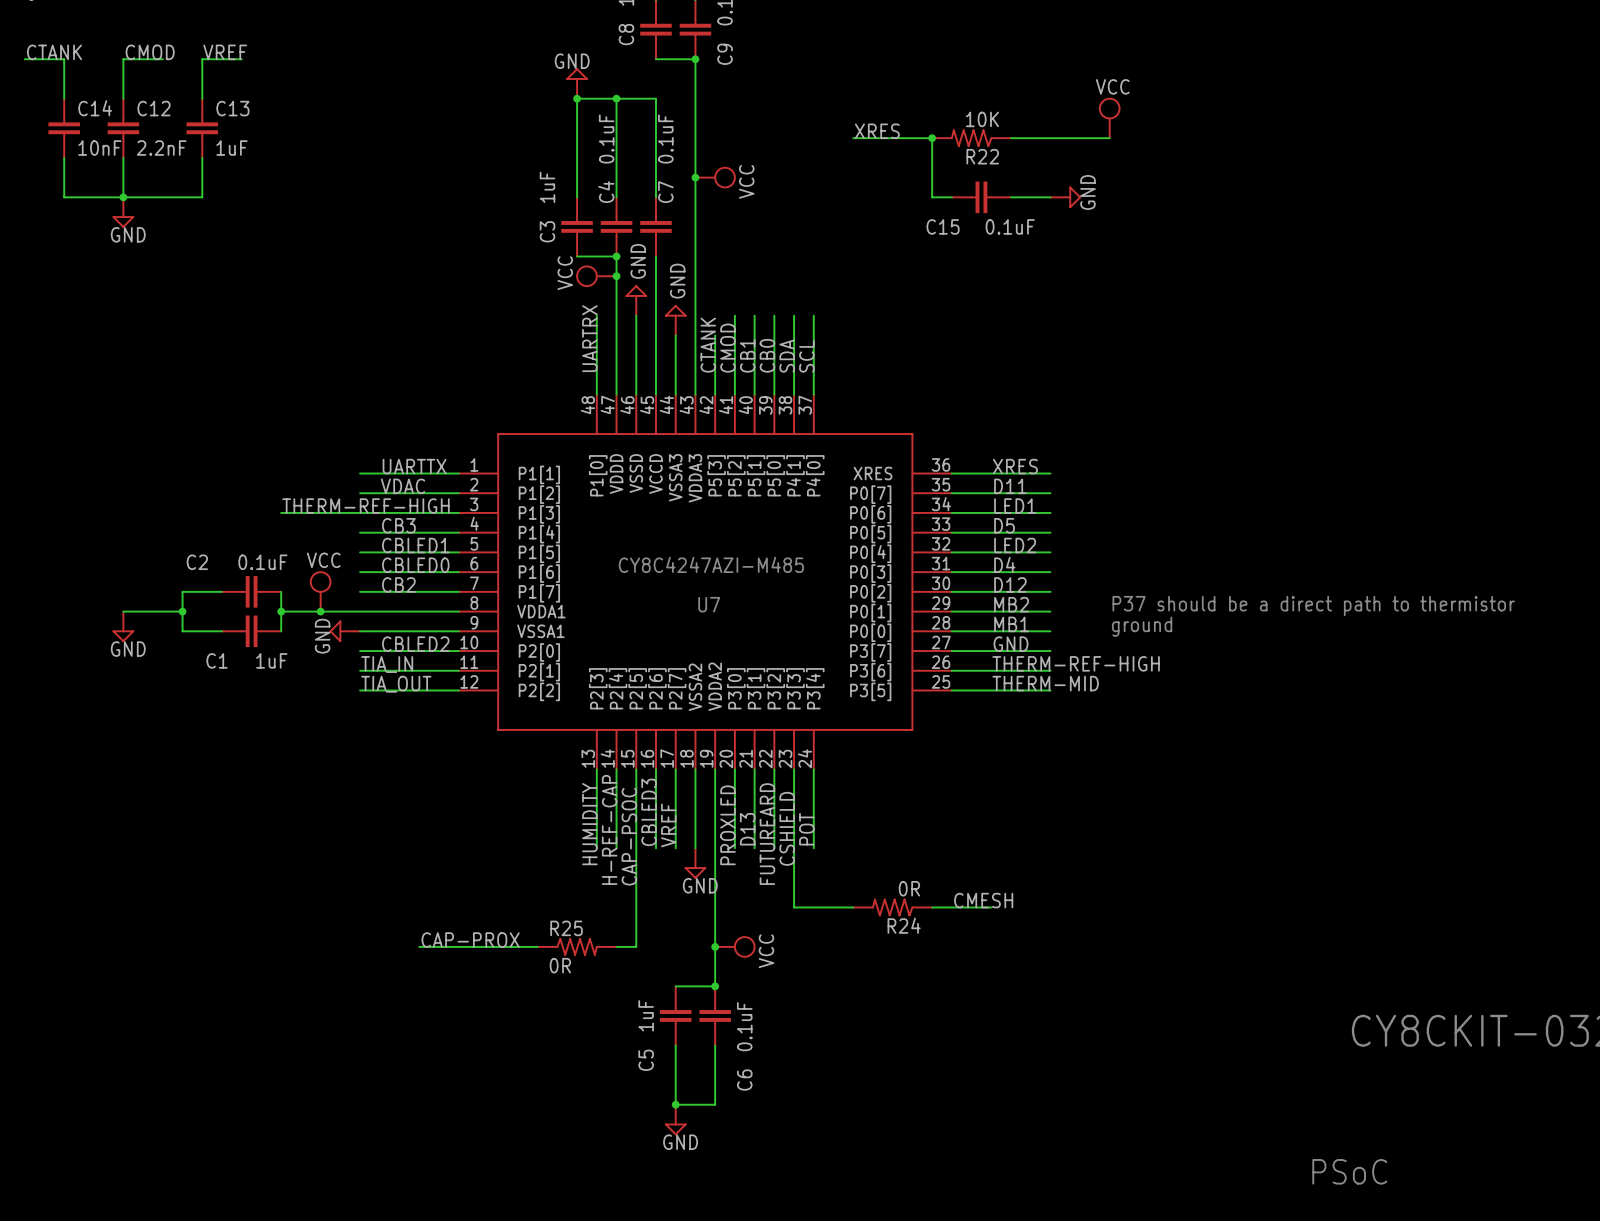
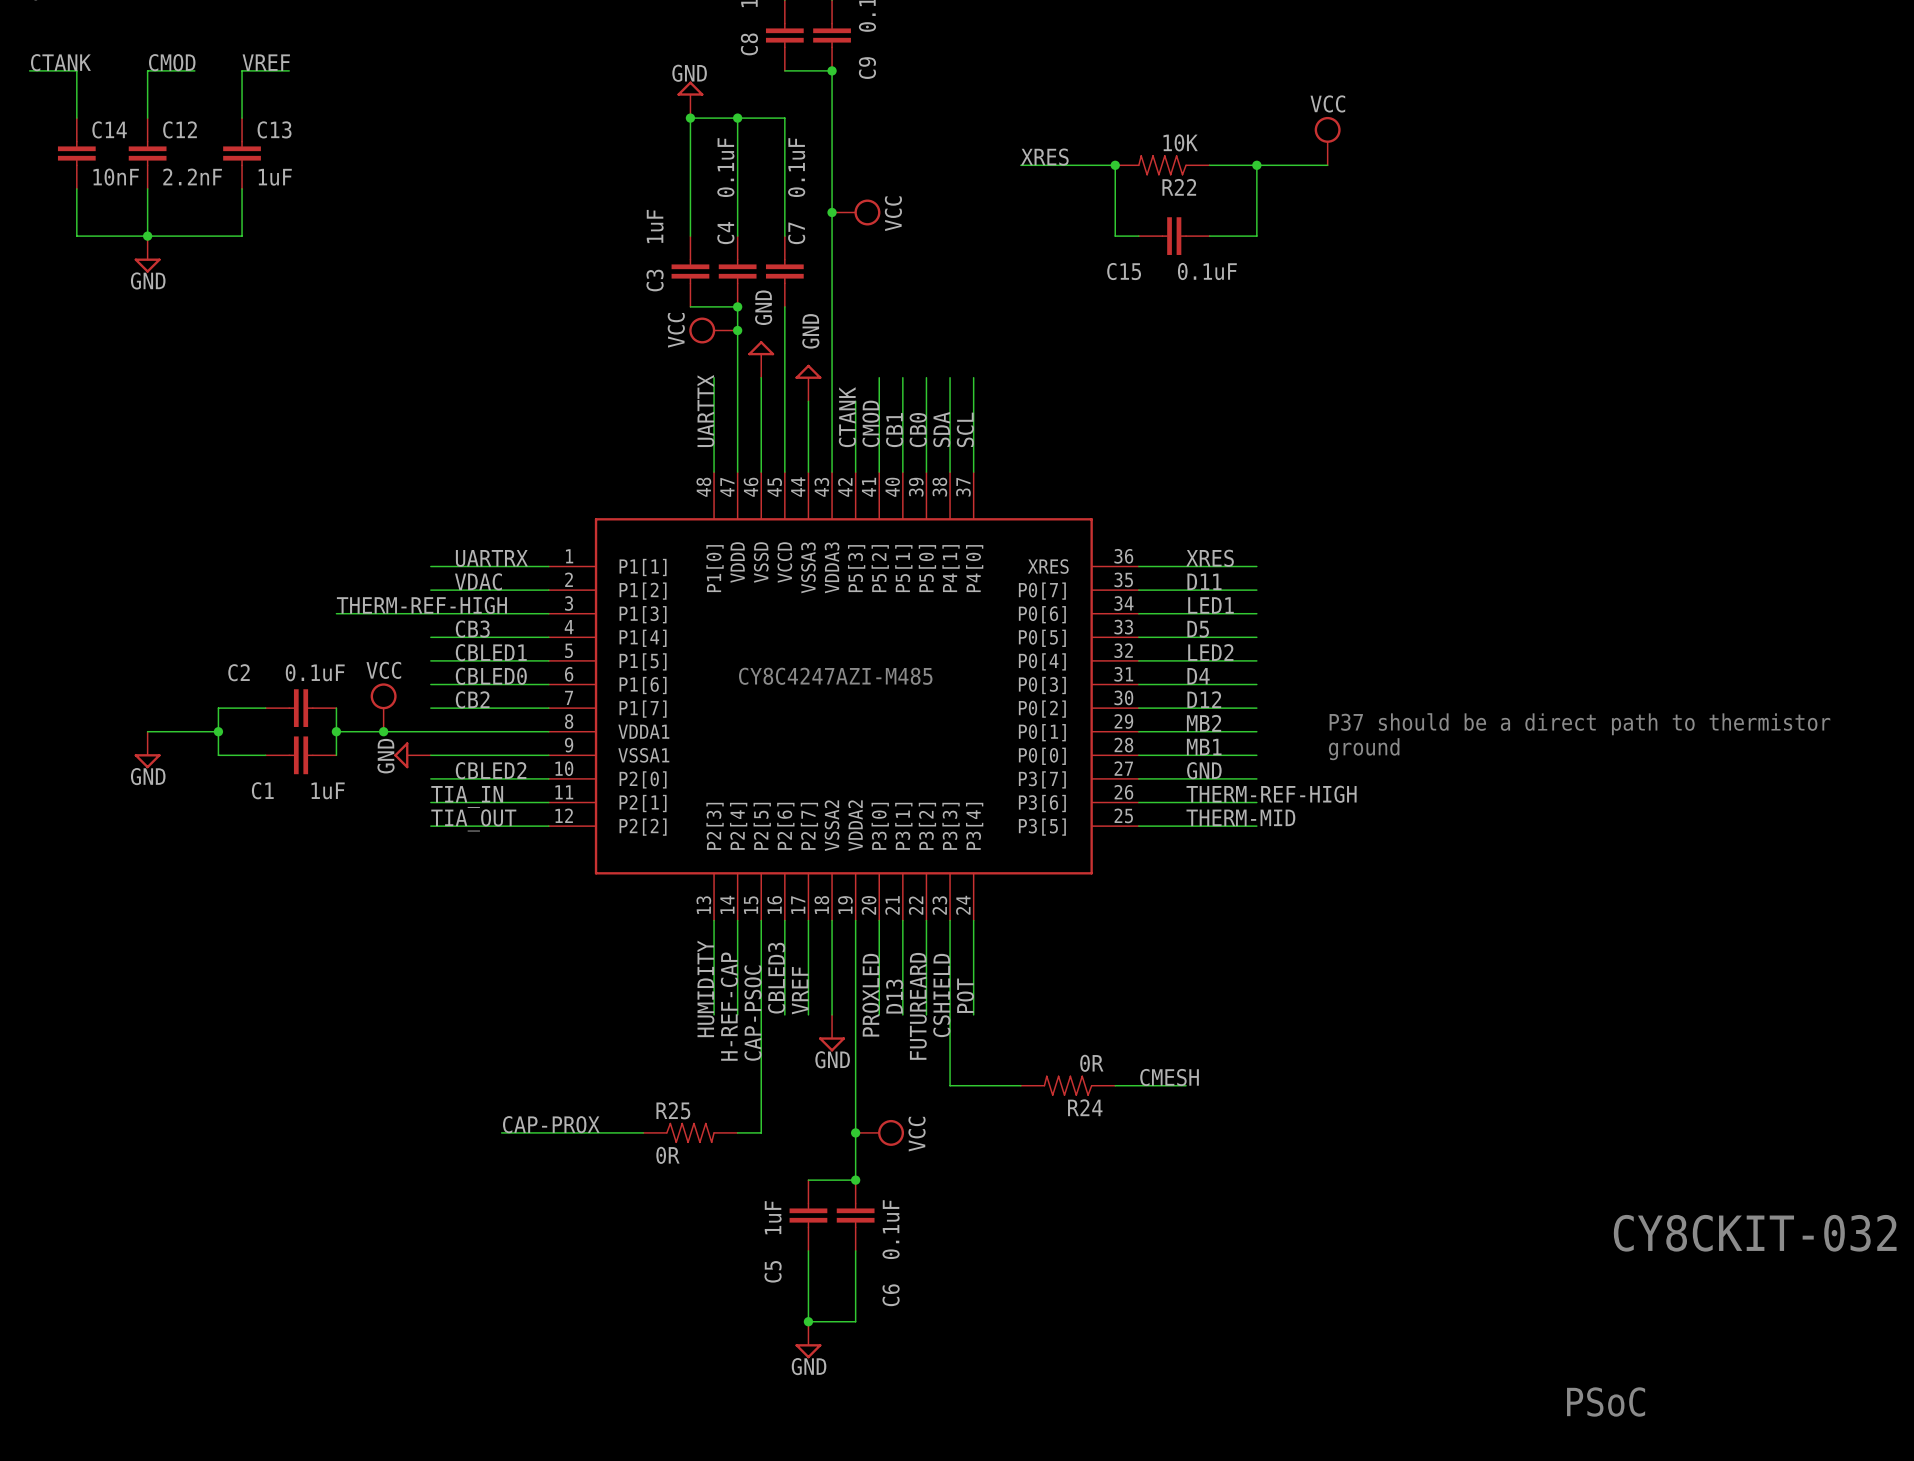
wire: none -> (1256, 165) (1256, 236)
junction: none -> (1256, 165)
power symbol: GND (1065, 197) -> none
label: UARTRX (589, 338) -> UARTTX (705, 411)
label: UARTTX (414, 466) -> UARTRX (491, 558)
text: U7 (709, 604) -> none

